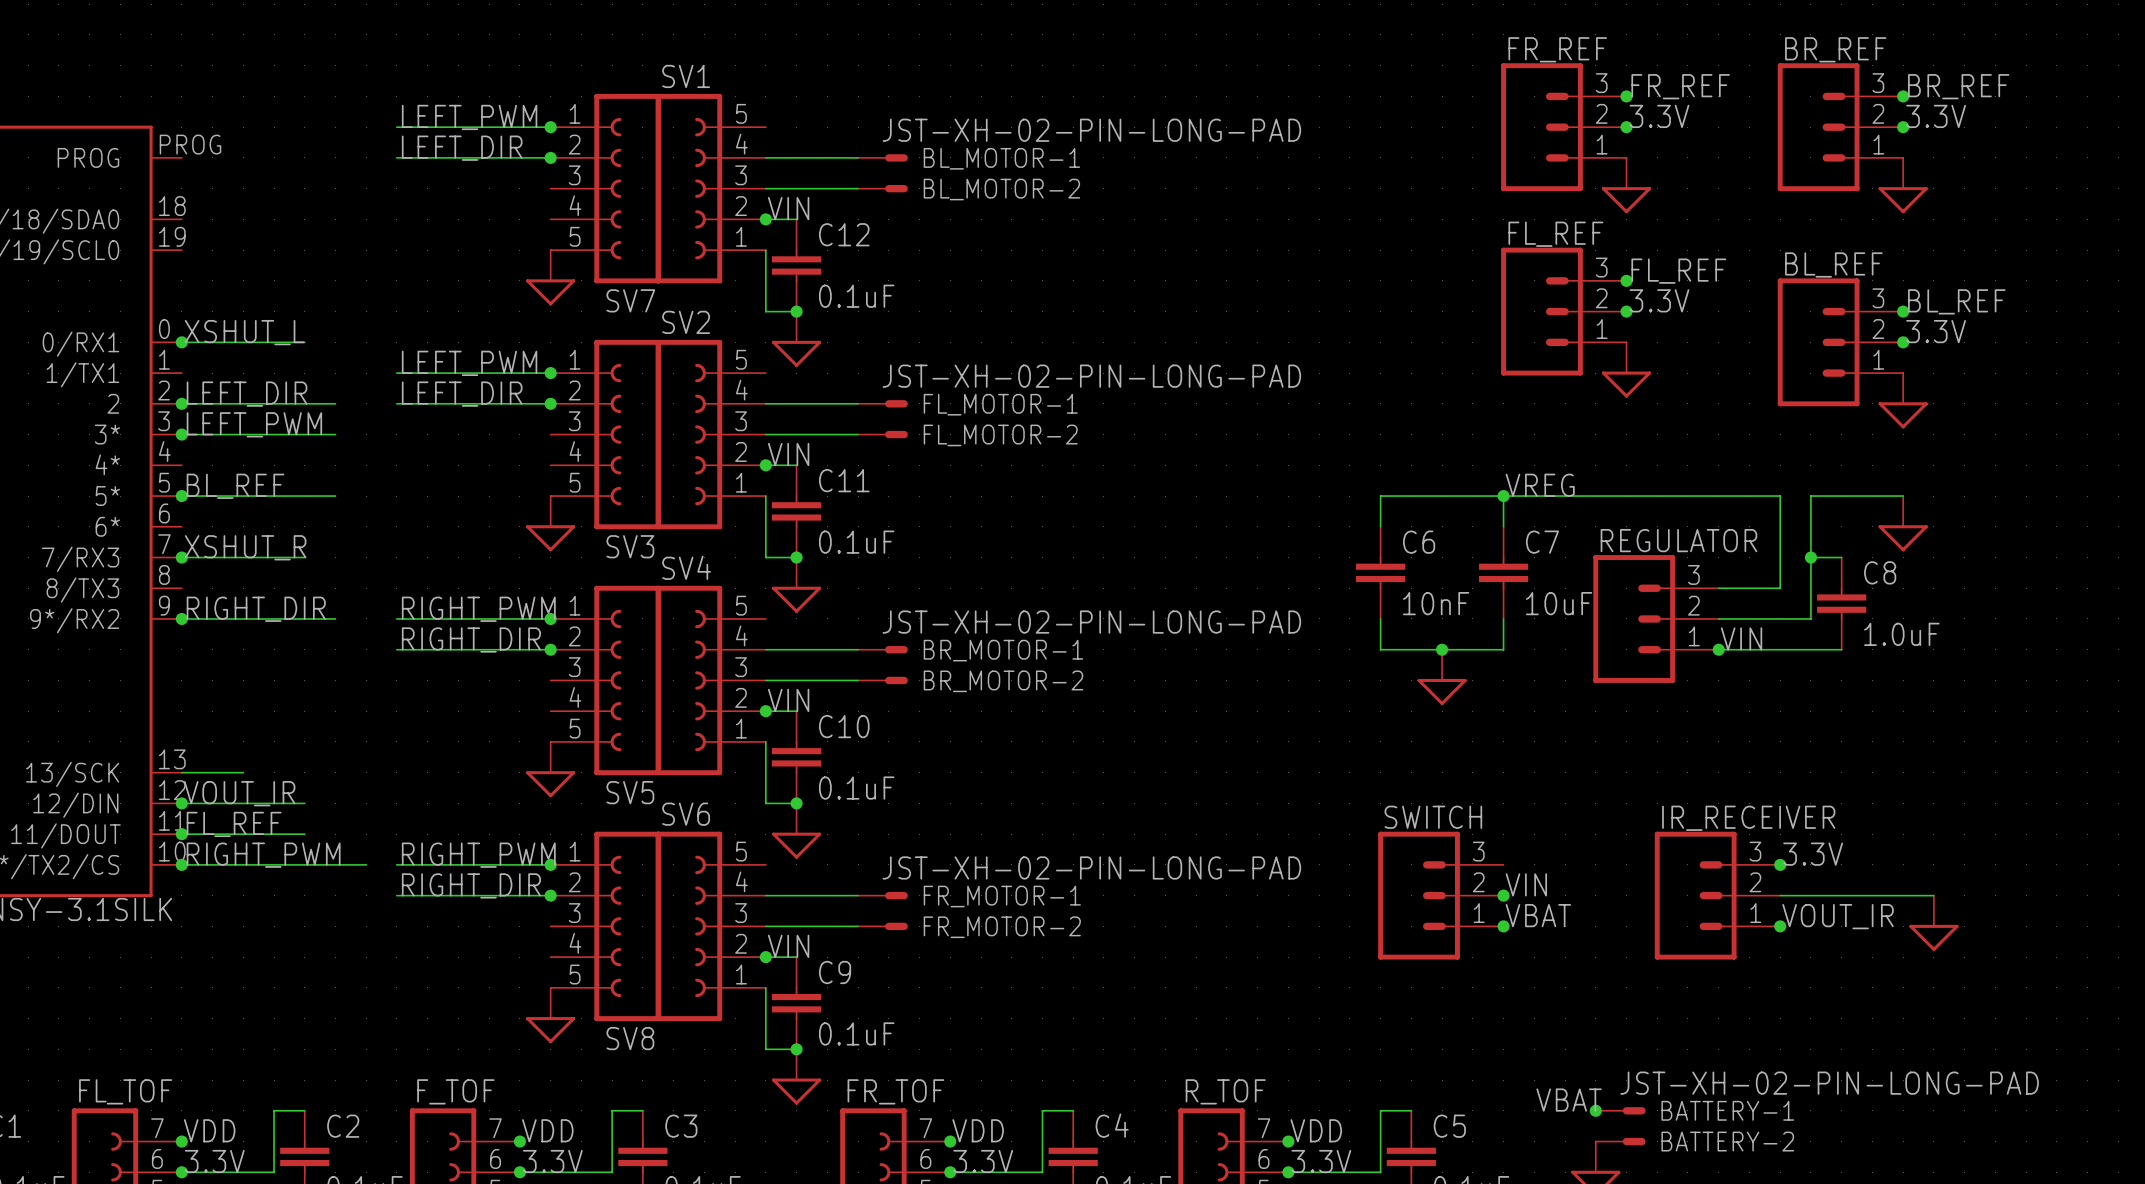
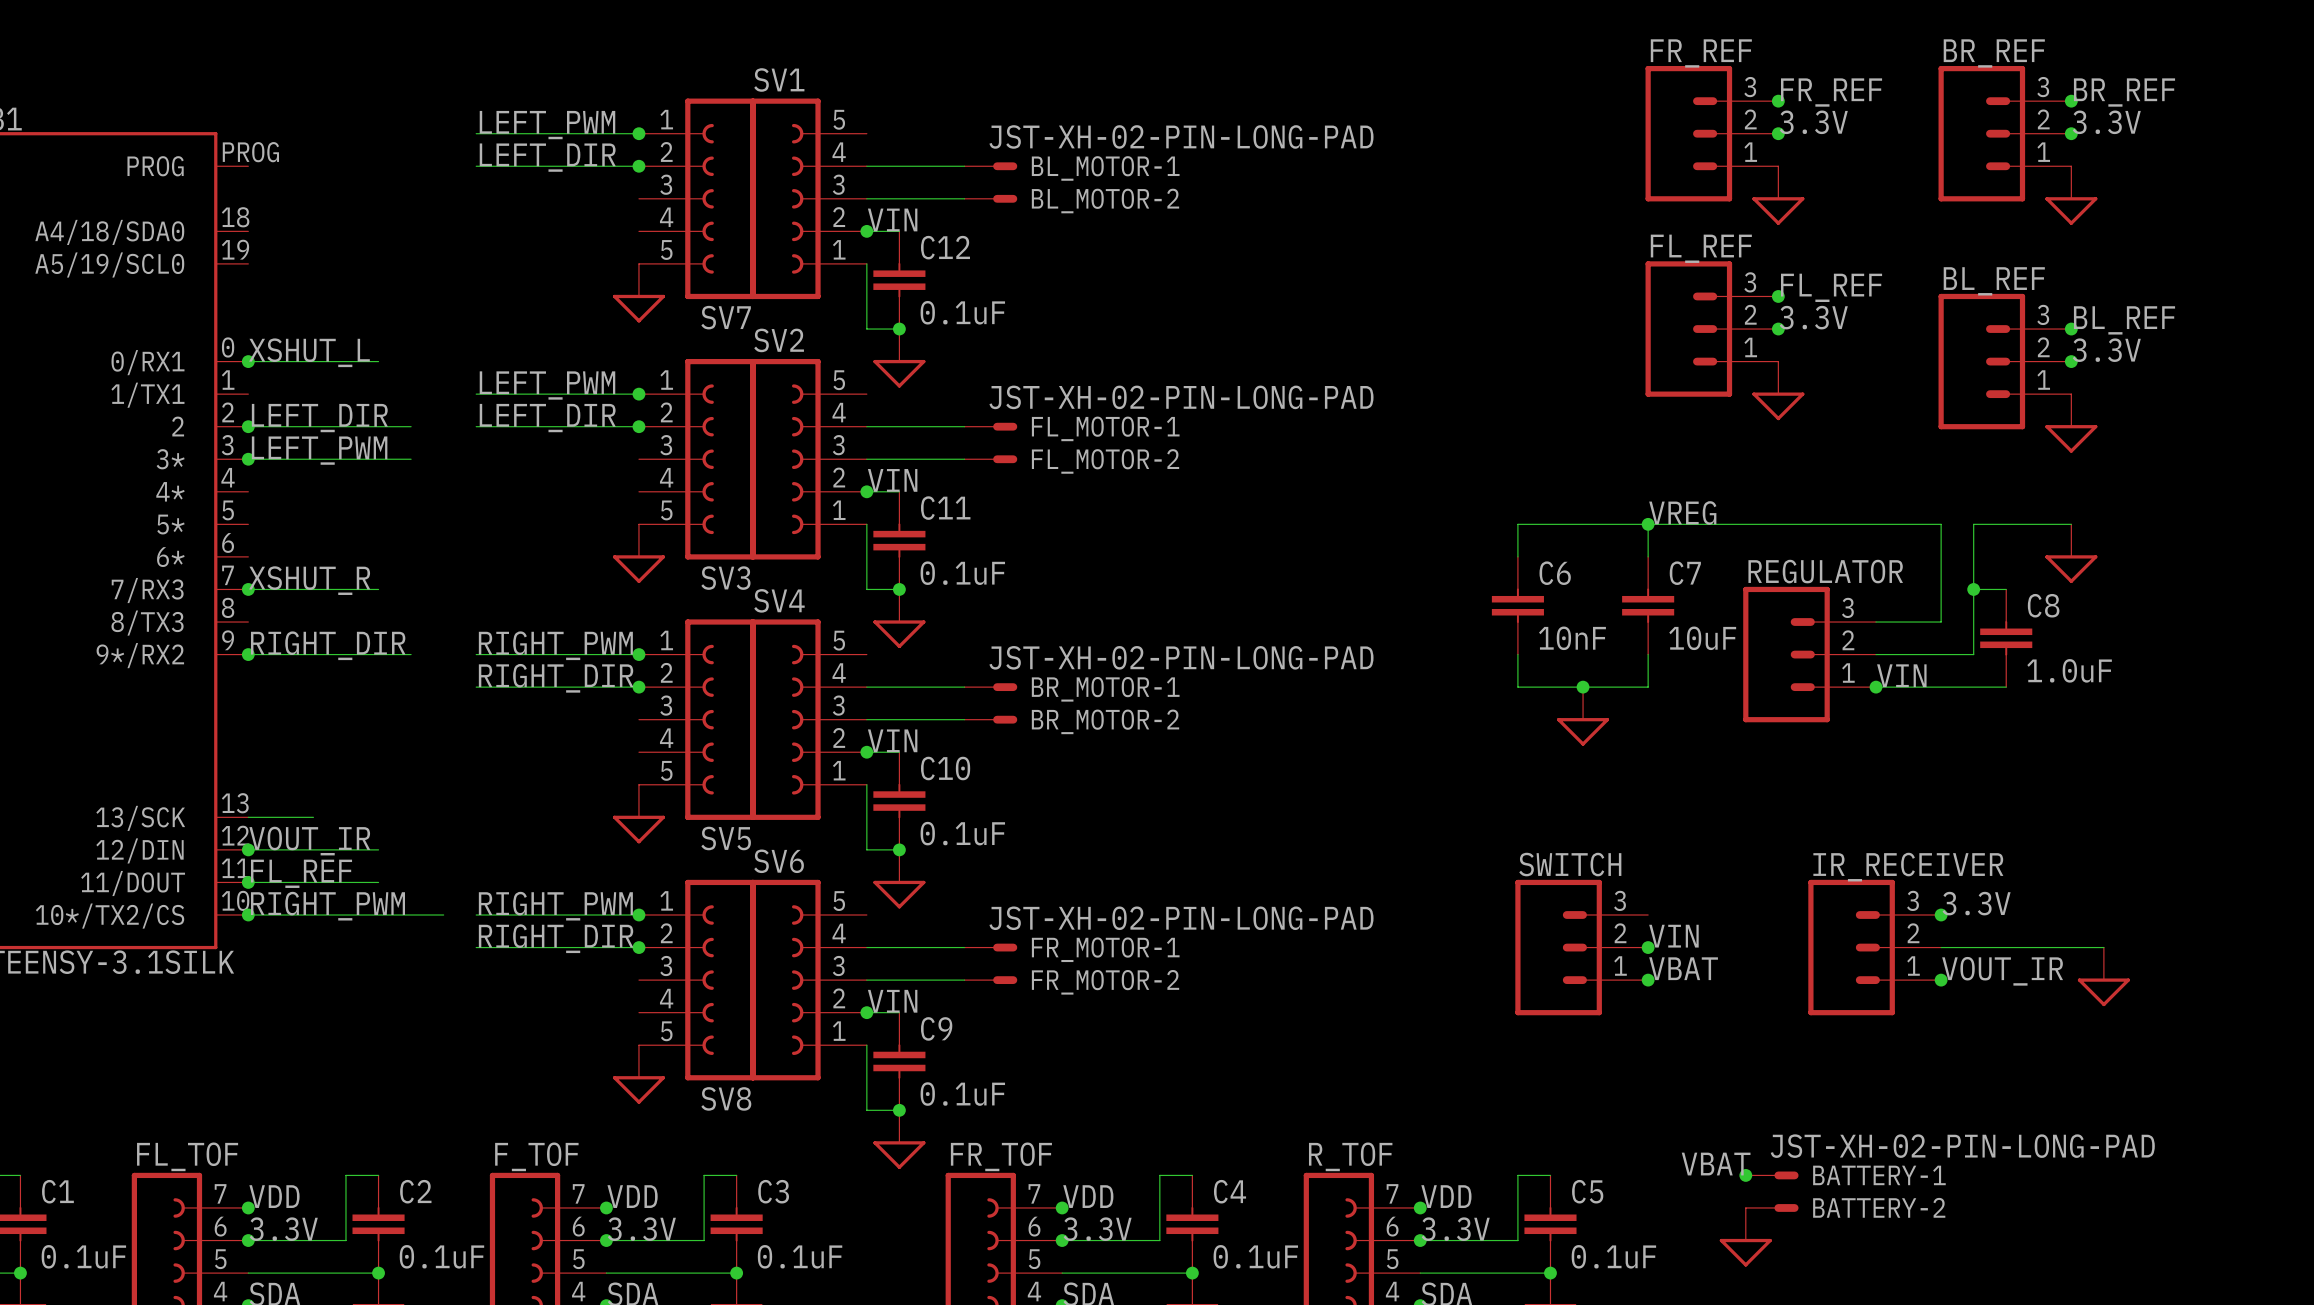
label: BL_REF (235, 486) -> none
wire: (181, 496) (335, 496) -> none
junction: (181, 496) -> none

